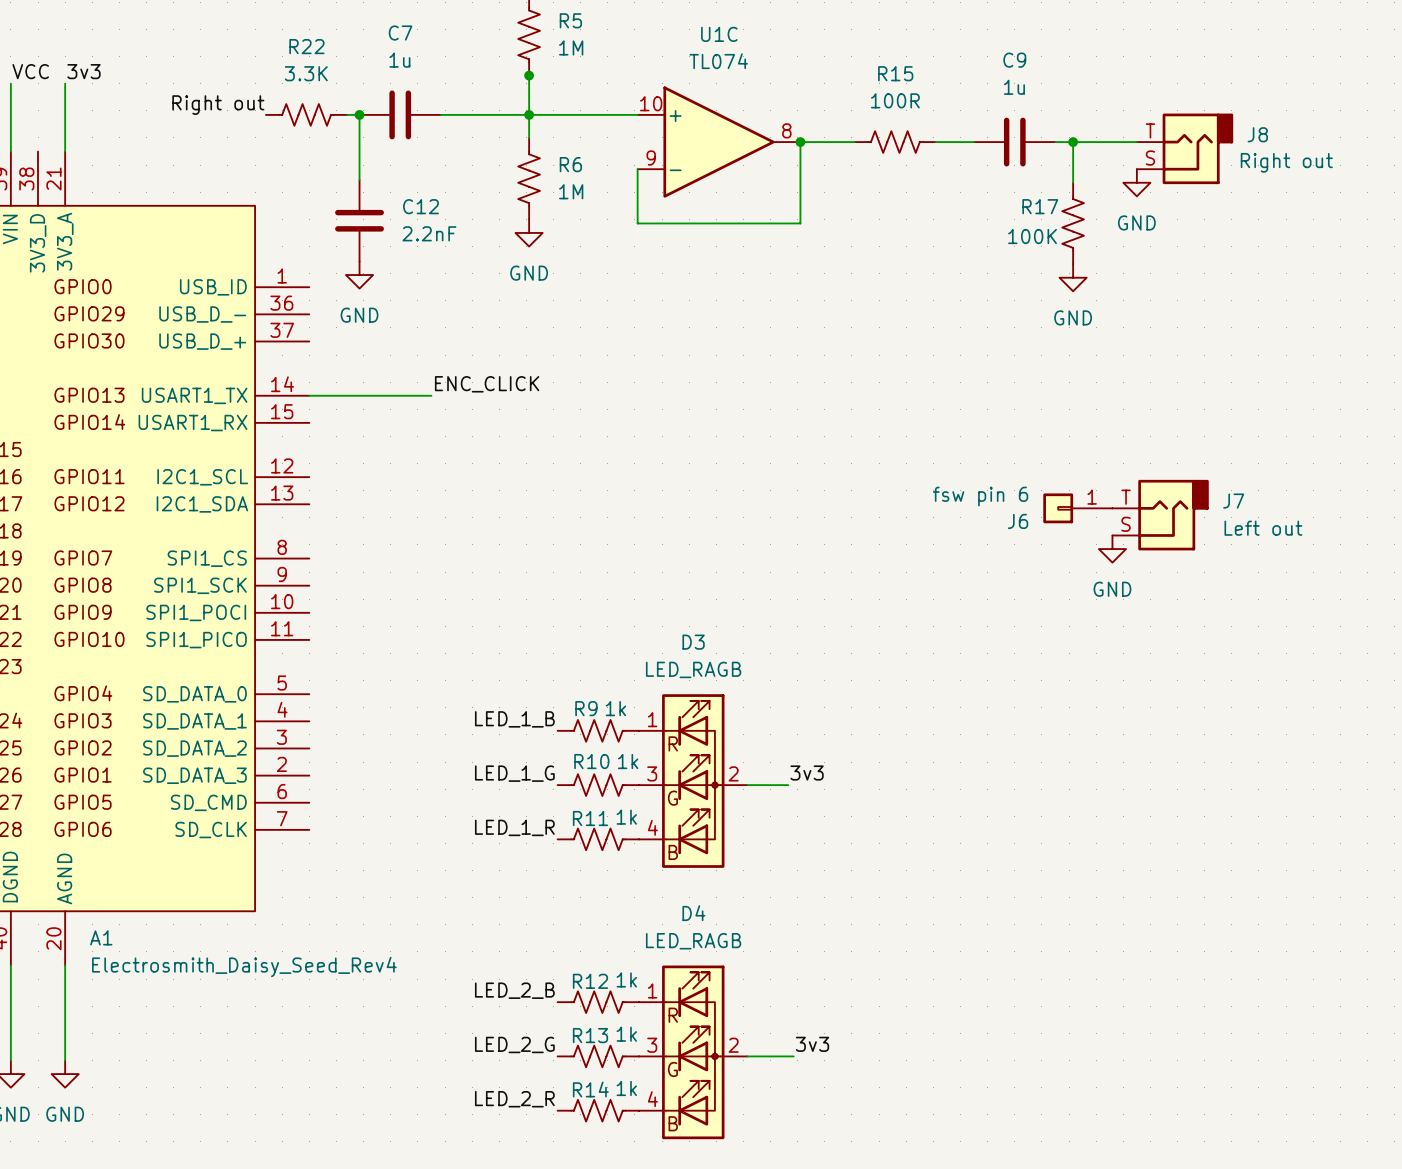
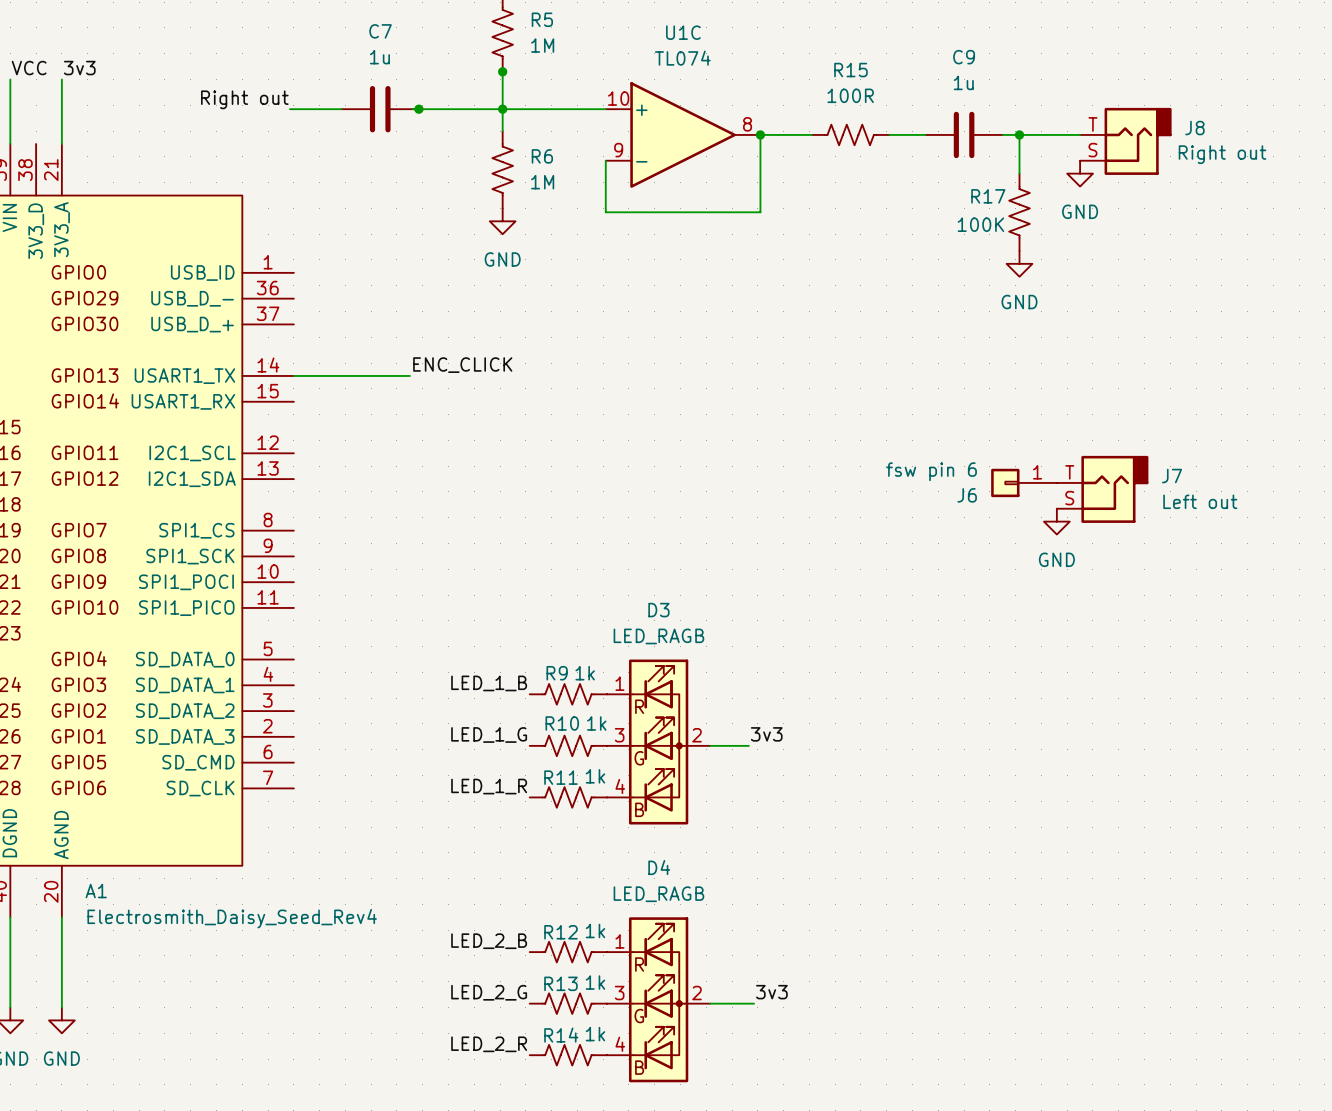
label position: Right out (218, 105) -> Right out (244, 99)
R22: 3.3K (306, 114) -> none
wire: (359, 114) (359, 180) -> none
junction: (359, 114) -> none
junction: none -> (418, 109)
C12: 2.2nF (359, 220) -> none
power symbol: GND (359, 275) -> none

